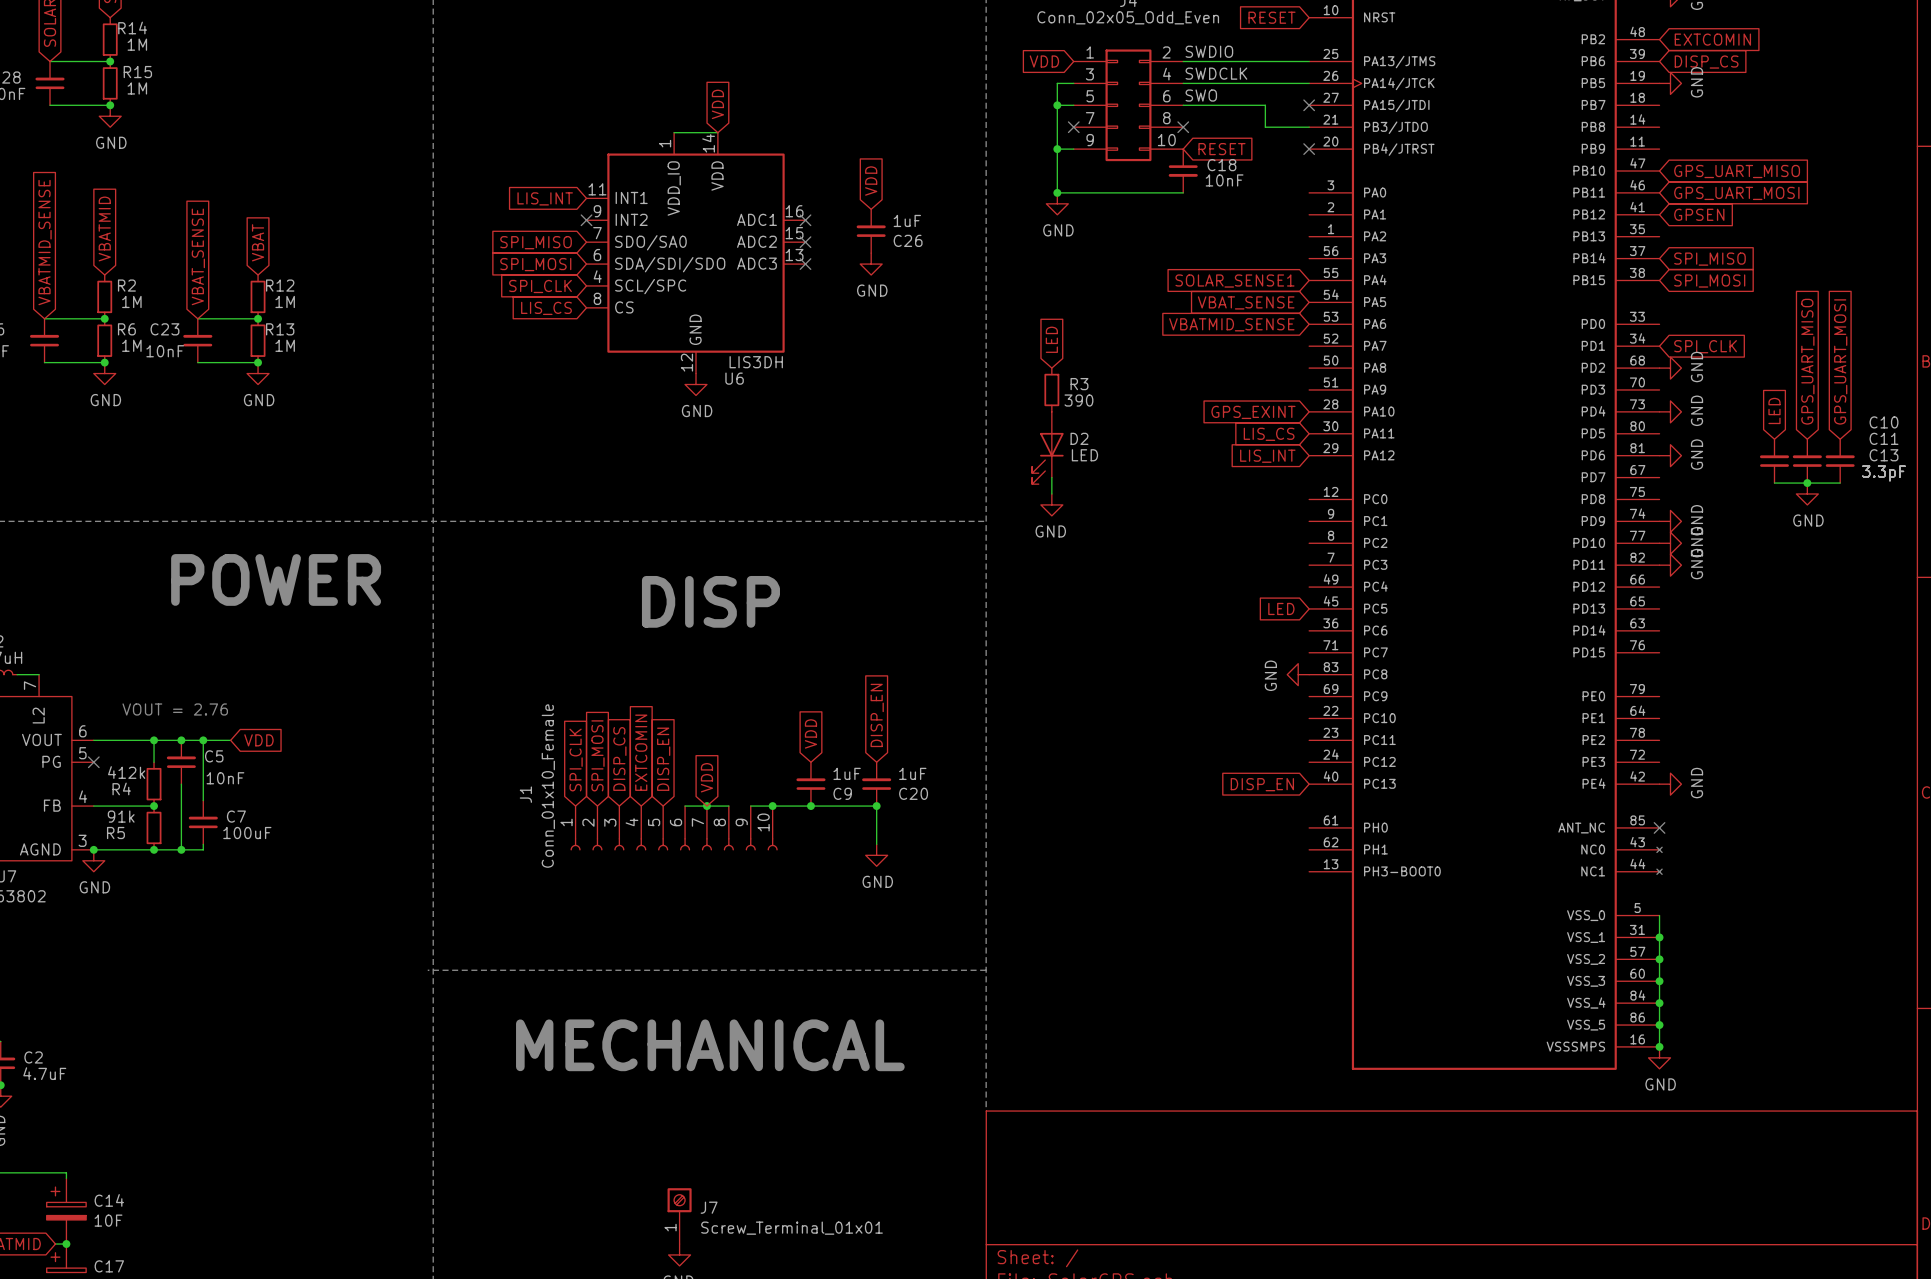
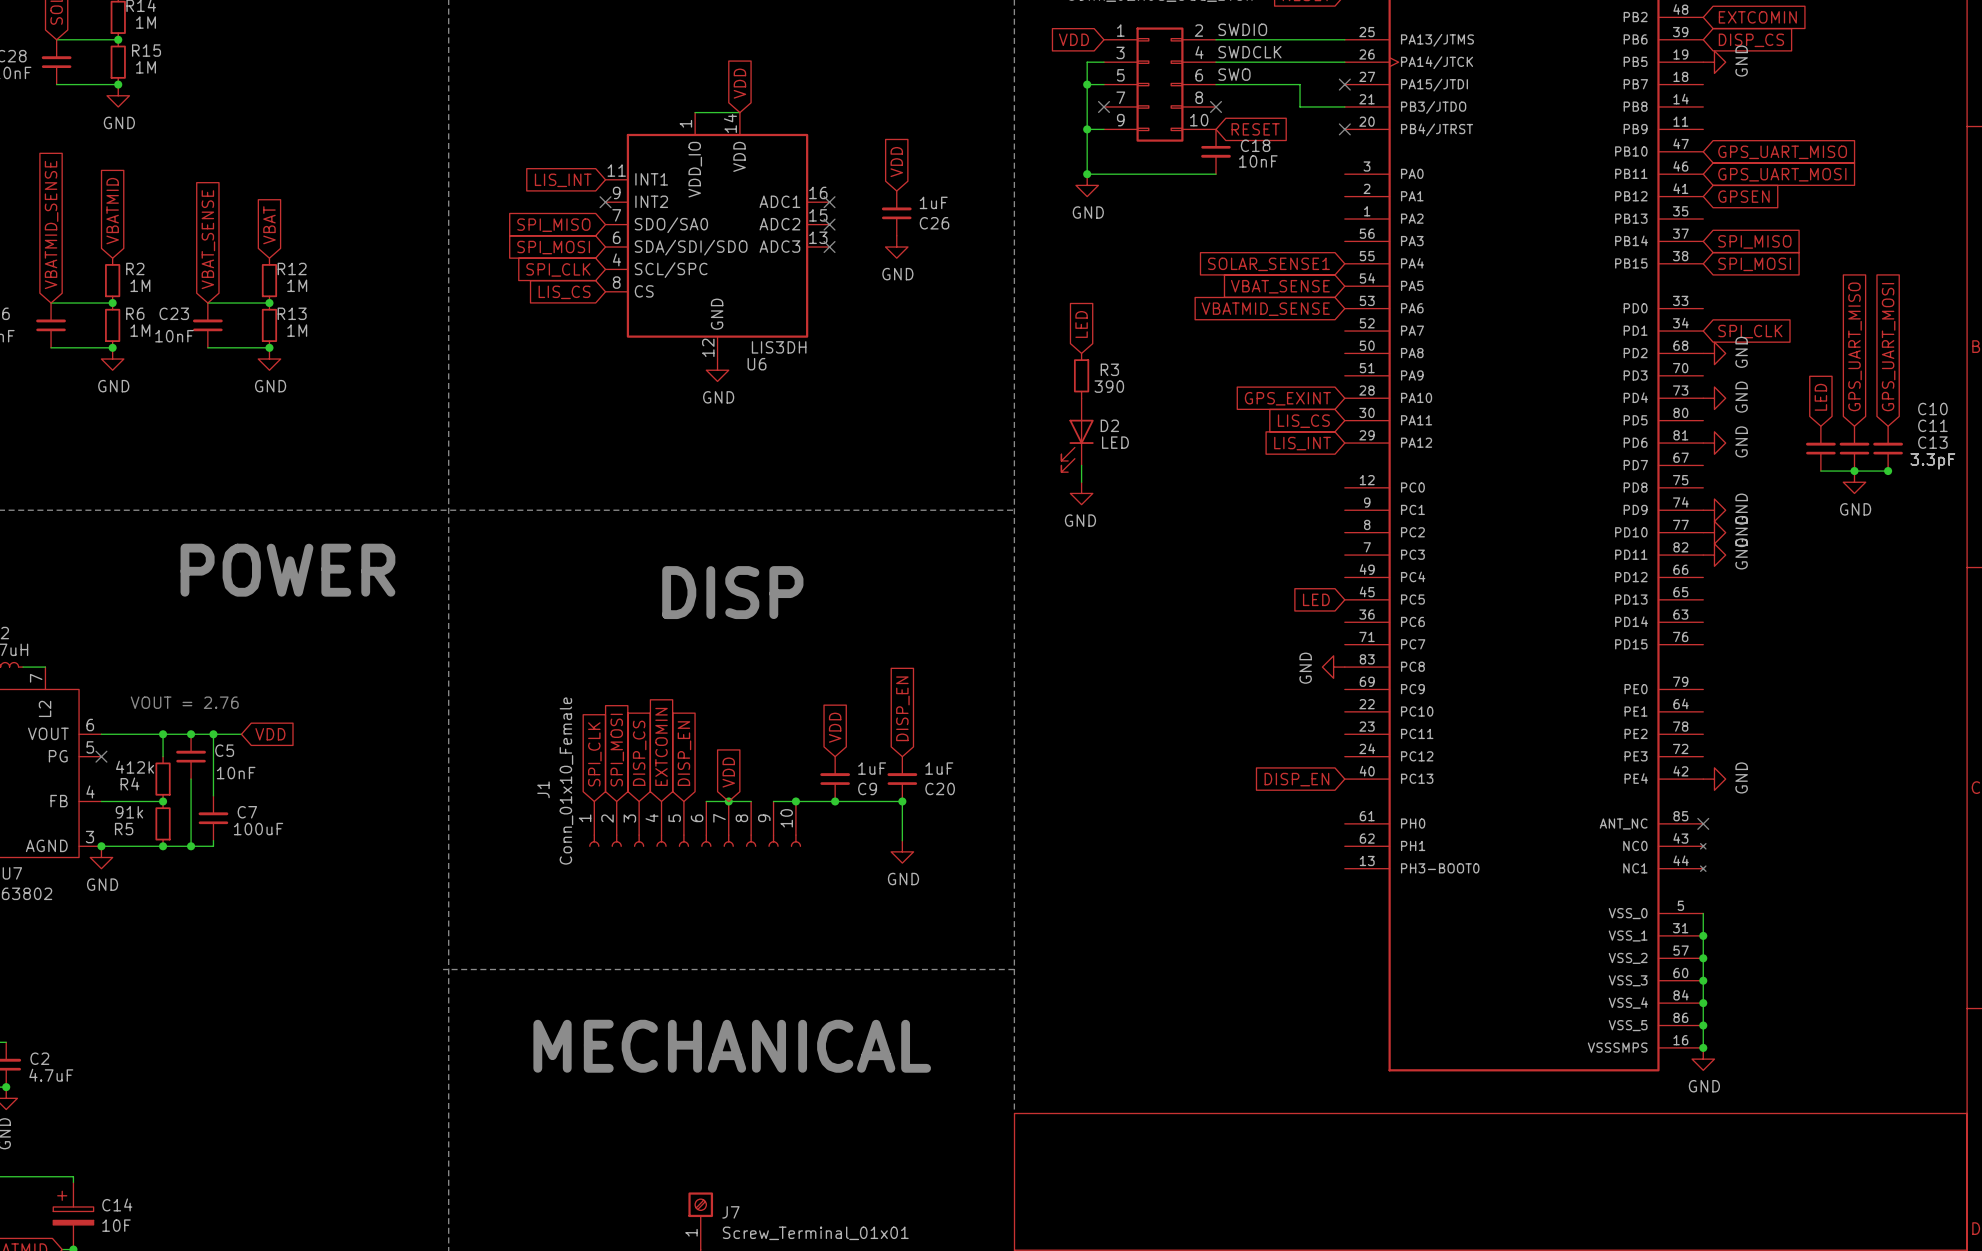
junction: none -> (1888, 471)

